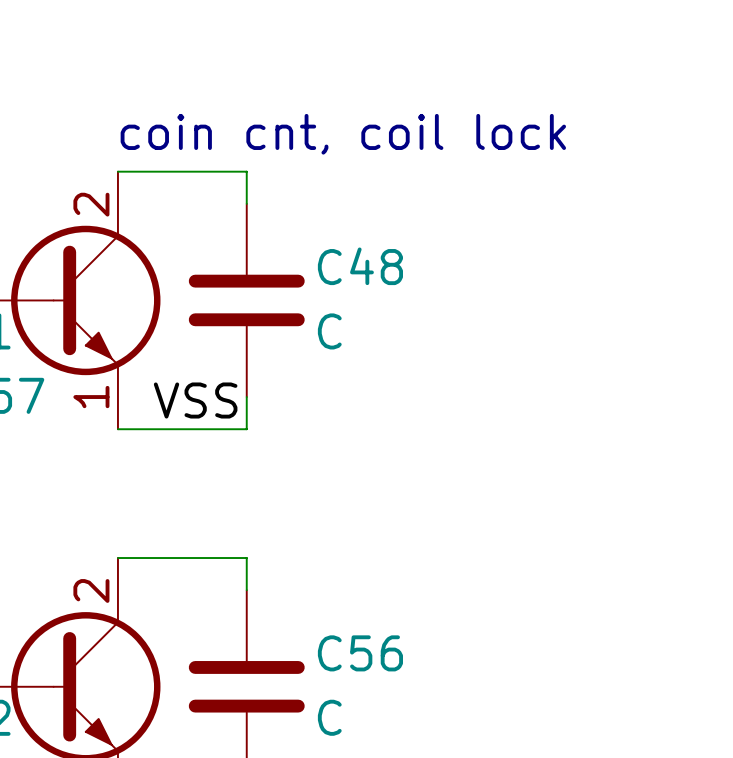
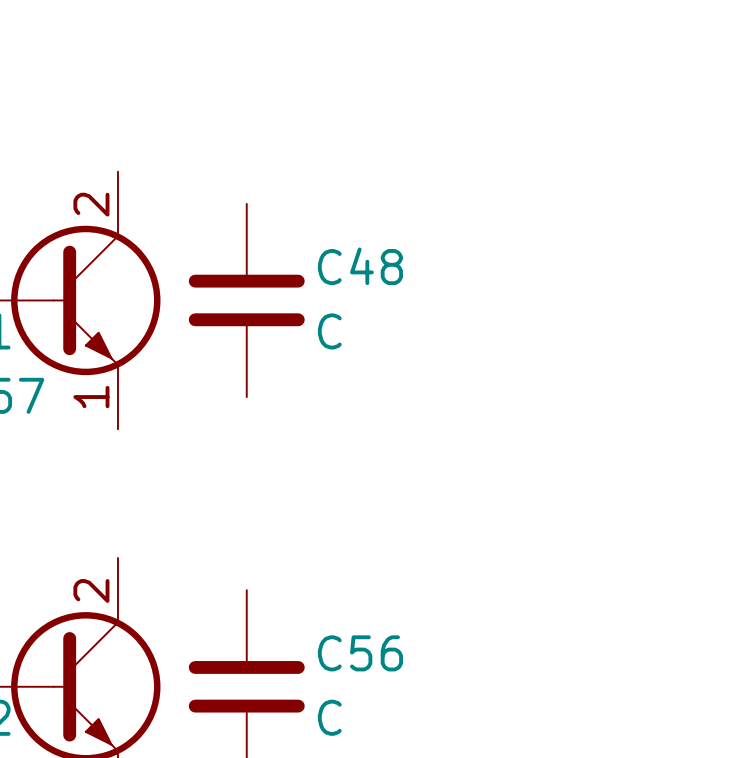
text: coin cnt, coil lock (343, 134) -> none
wire: (117, 171) (246, 171) (246, 203) -> none
wire: (246, 397) (246, 429) (117, 429) -> none
label: VSS (195, 400) -> none
wire: (117, 558) (246, 558) (246, 590) -> none

